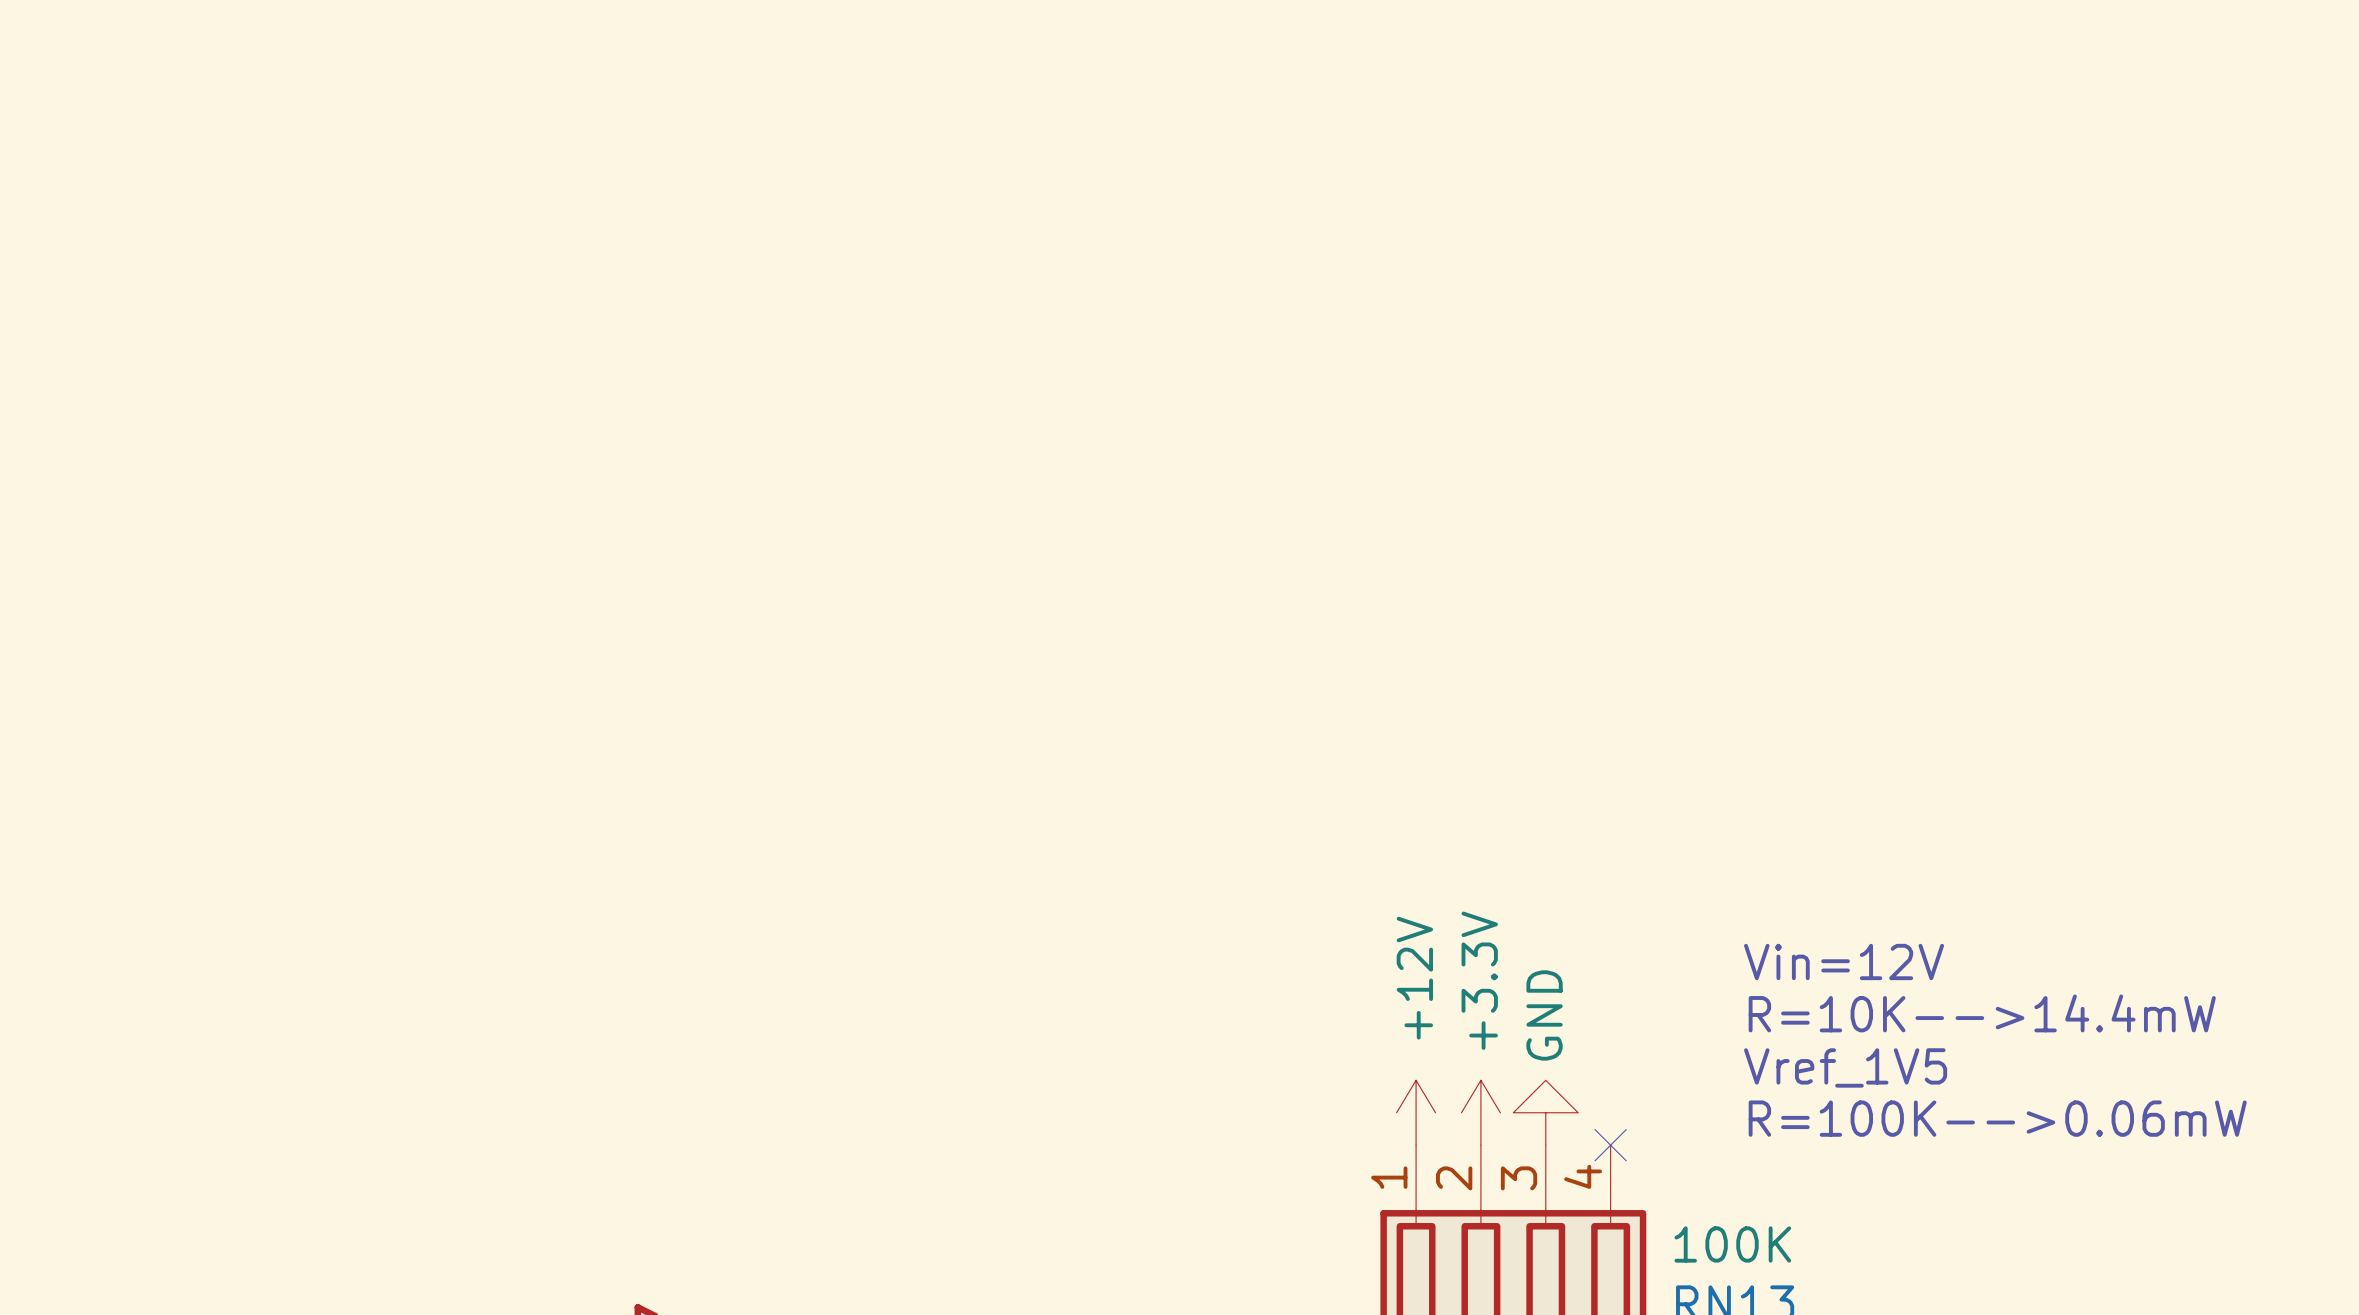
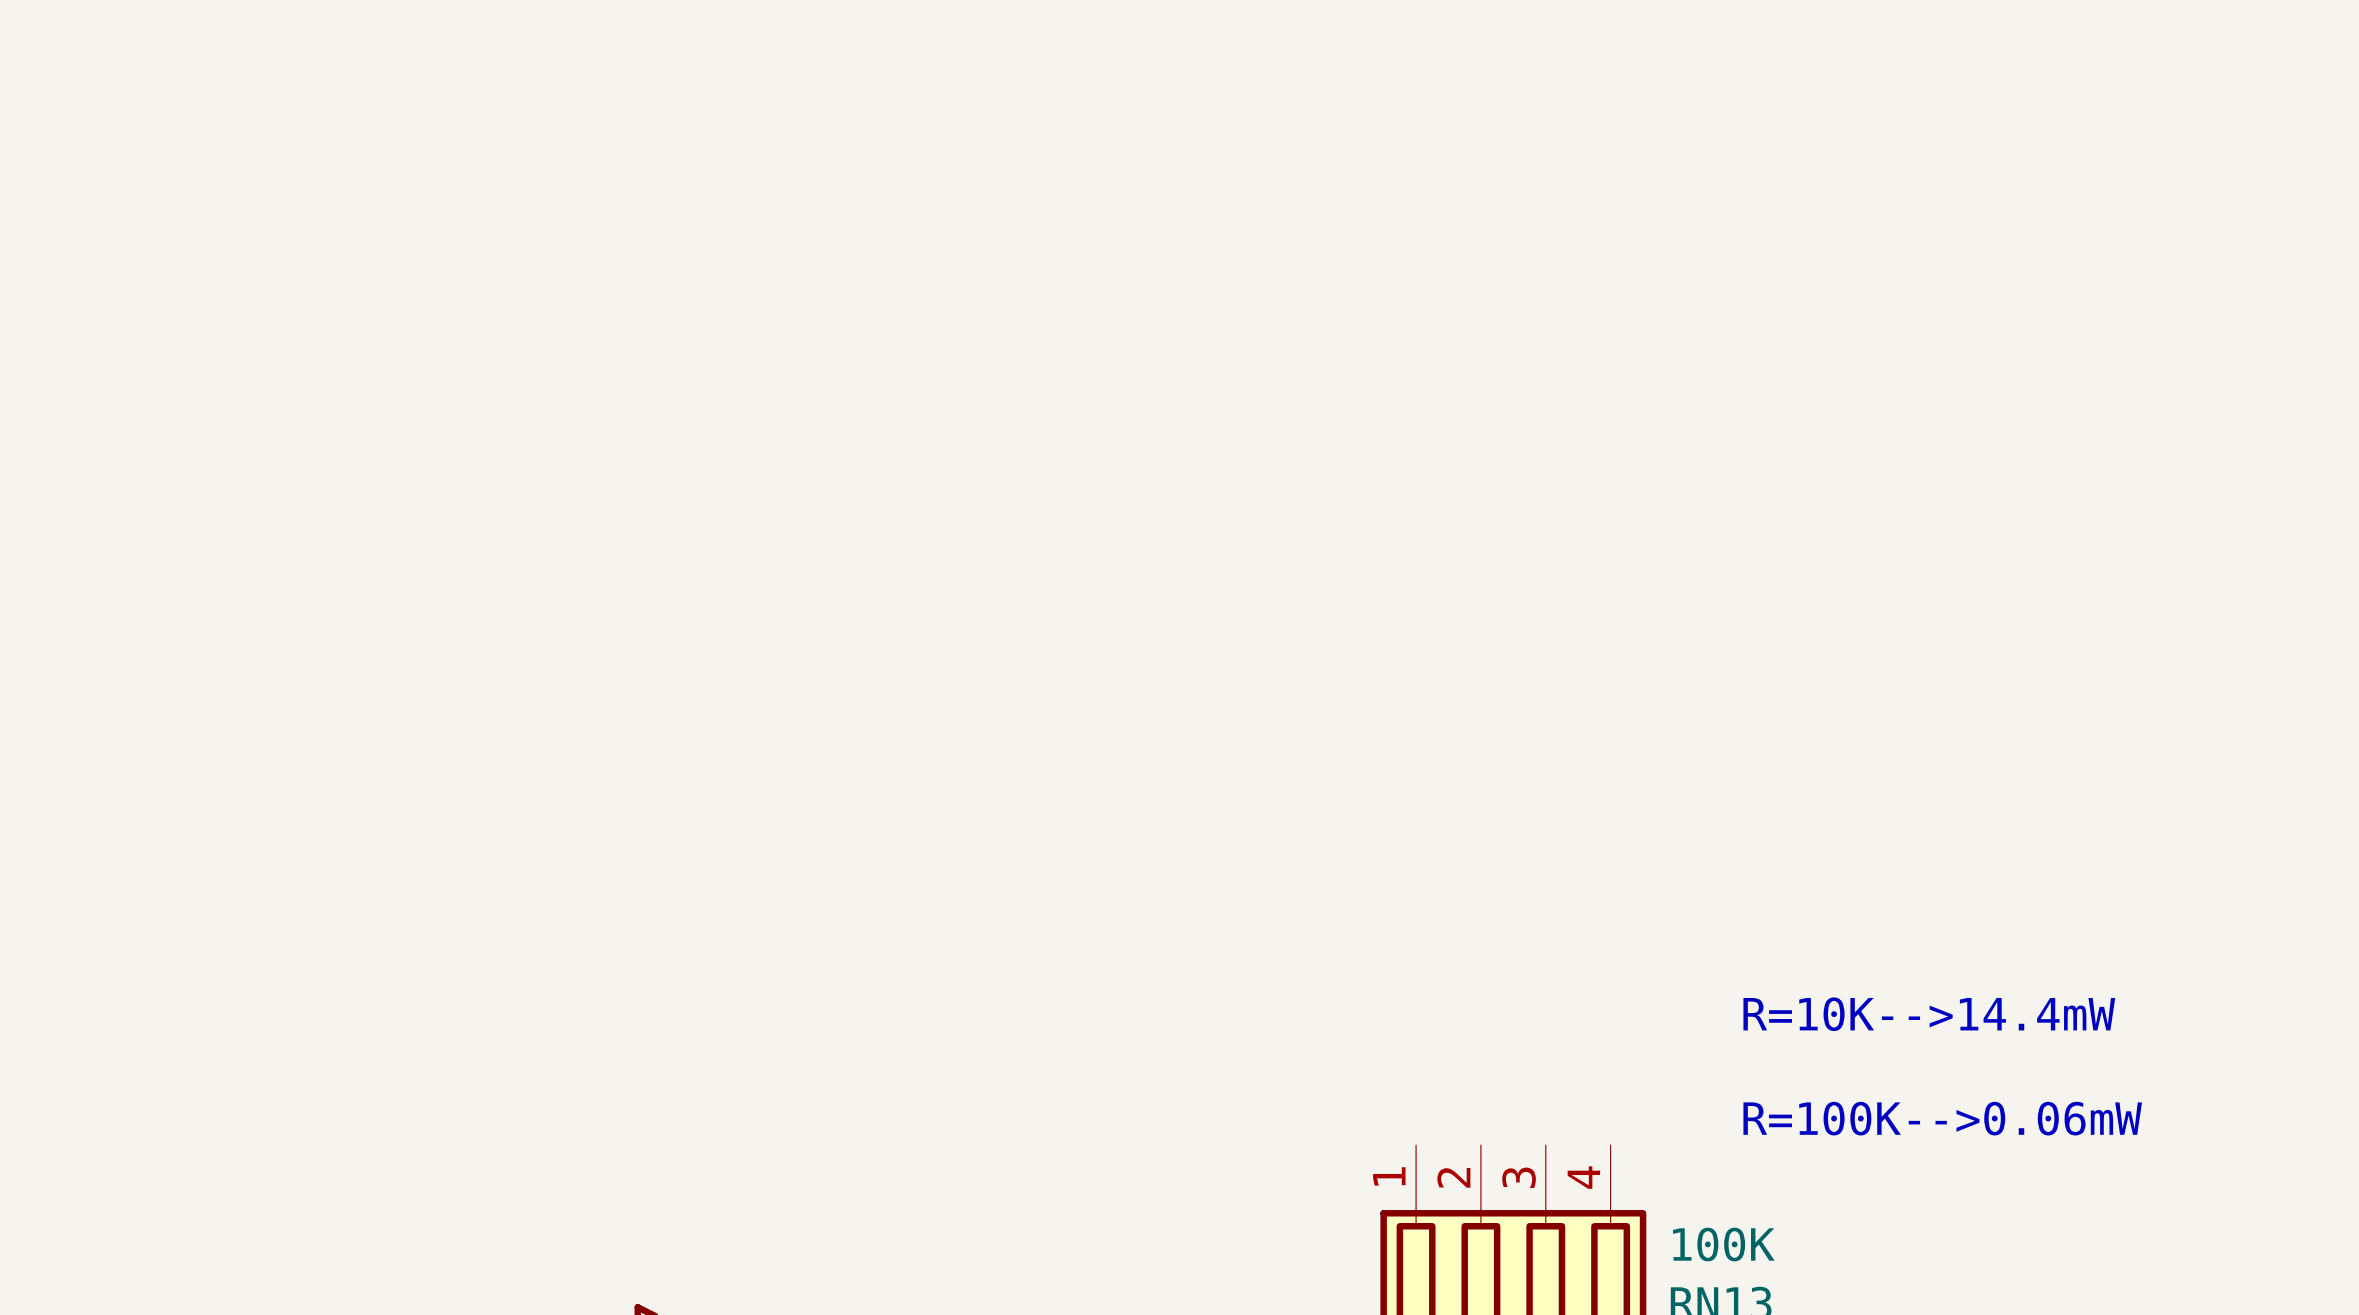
text: Vin=12V (1844, 961) -> none
text: Vref_1V5 (1845, 1067) -> none
power symbol: +12V (1416, 1112) -> none
power symbol: +3.3V (1480, 1112) -> none
power symbol: GND (1545, 1112) -> none
no-connect mark: (1610, 1145) -> none

